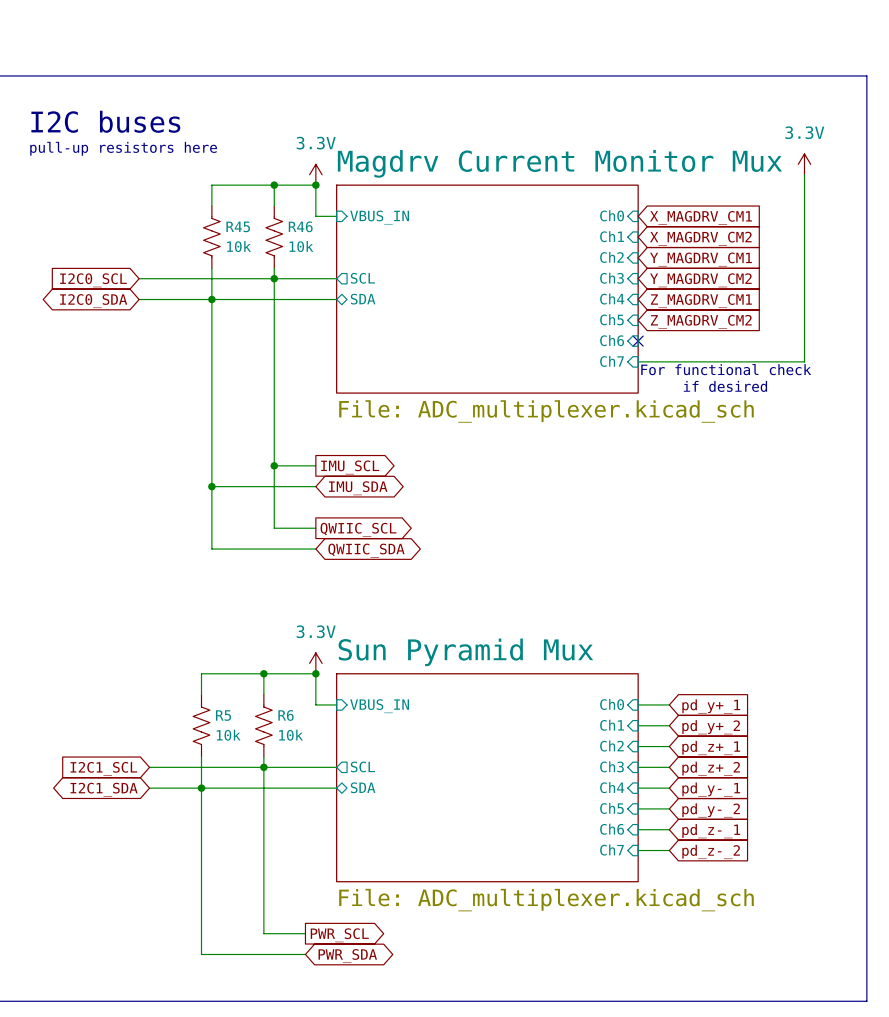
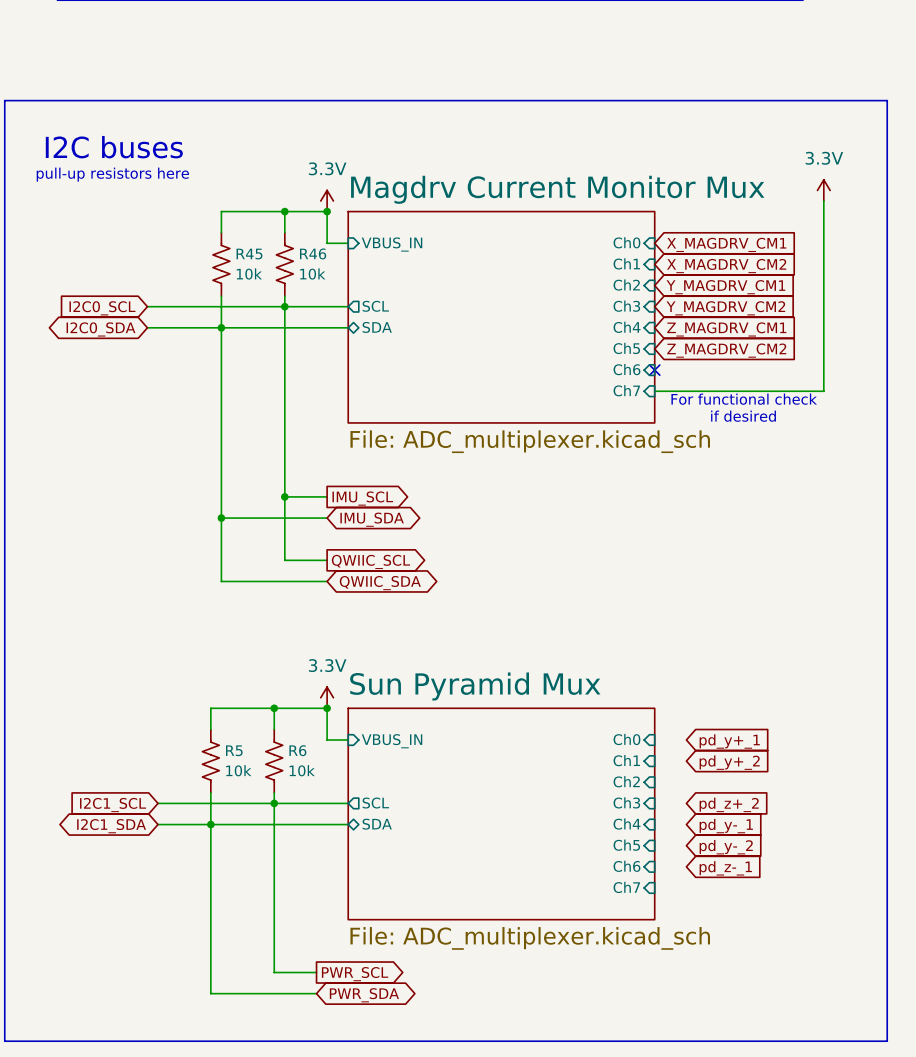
wire: (638, 704) (669, 704) -> none
wire: (638, 725) (669, 725) -> none
wire: (638, 746) (669, 746) -> none
global label: pd_z+_1 (711, 748) -> none
wire: (638, 767) (669, 767) -> none
wire: (638, 788) (669, 788) -> none
wire: (638, 808) (669, 808) -> none
wire: (638, 829) (669, 829) -> none
wire: (638, 850) (669, 850) -> none
global label: pd_z-_2 (711, 851) -> none

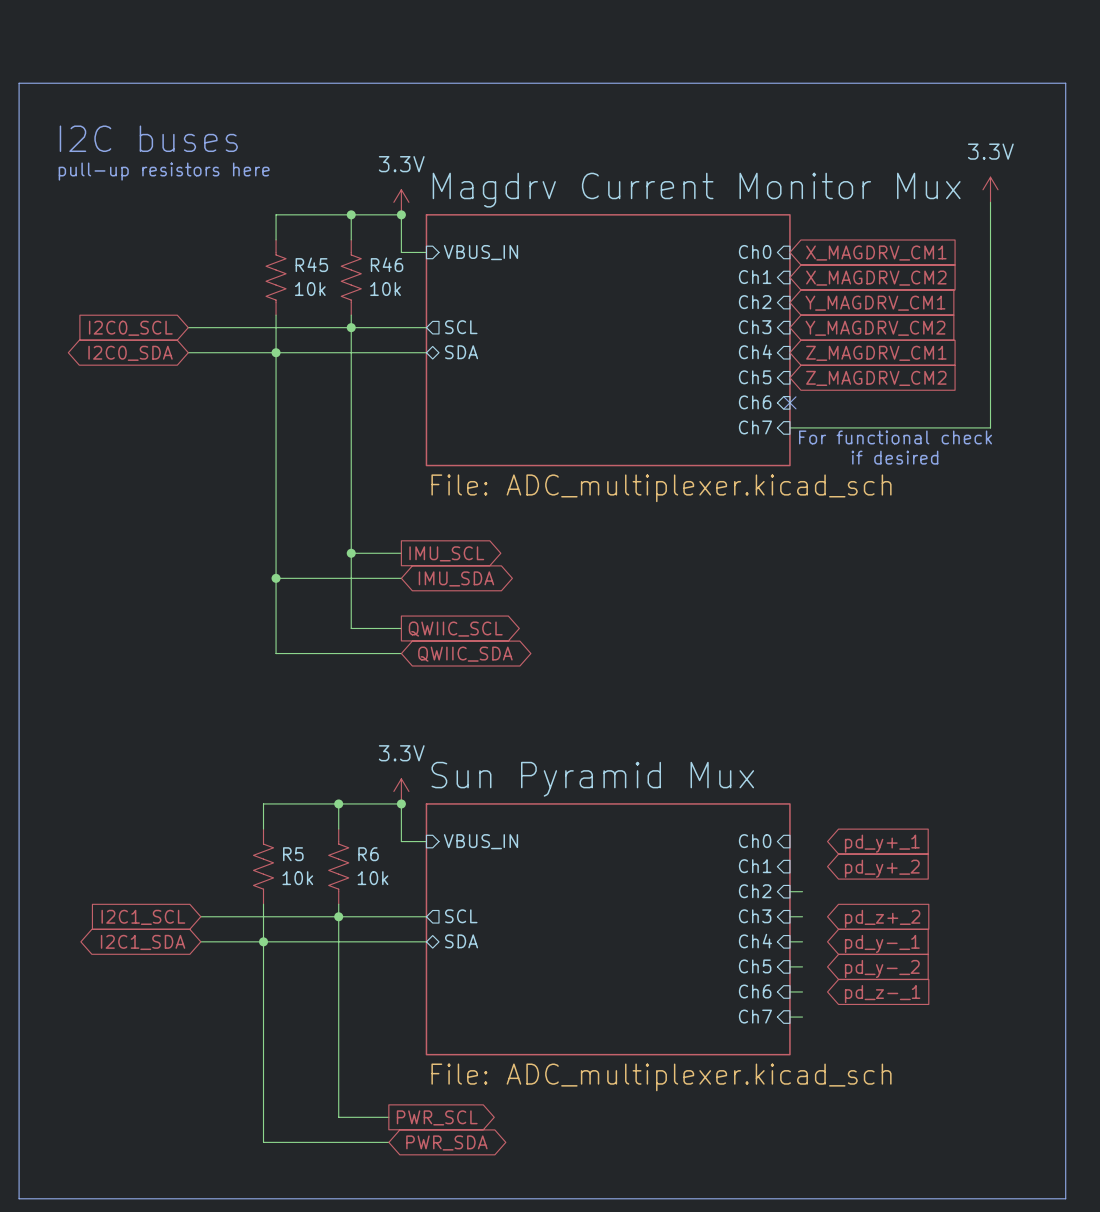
wire: none -> (789, 891) (802, 891)
wire: none -> (789, 916) (802, 916)
wire: none -> (789, 941) (802, 941)
wire: none -> (789, 966) (802, 966)
wire: none -> (789, 991) (802, 991)
wire: none -> (789, 1017) (802, 1017)

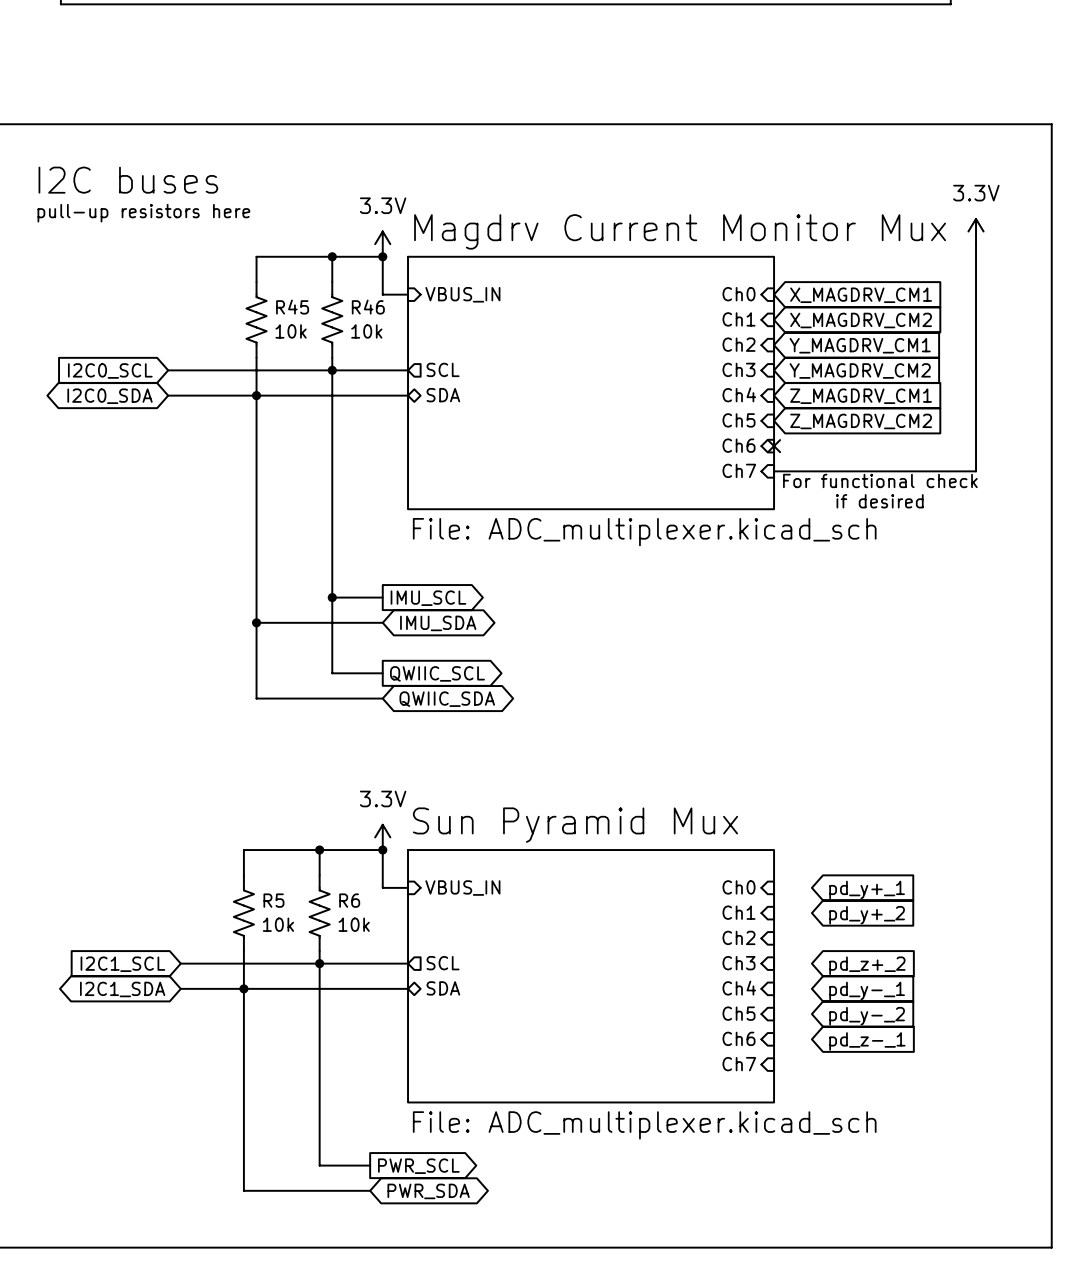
wire: (789, 891) (802, 891) -> none
wire: (789, 916) (802, 916) -> none
wire: (789, 941) (802, 941) -> none
wire: (789, 966) (802, 966) -> none
wire: (789, 991) (802, 991) -> none
wire: (789, 1017) (802, 1017) -> none

